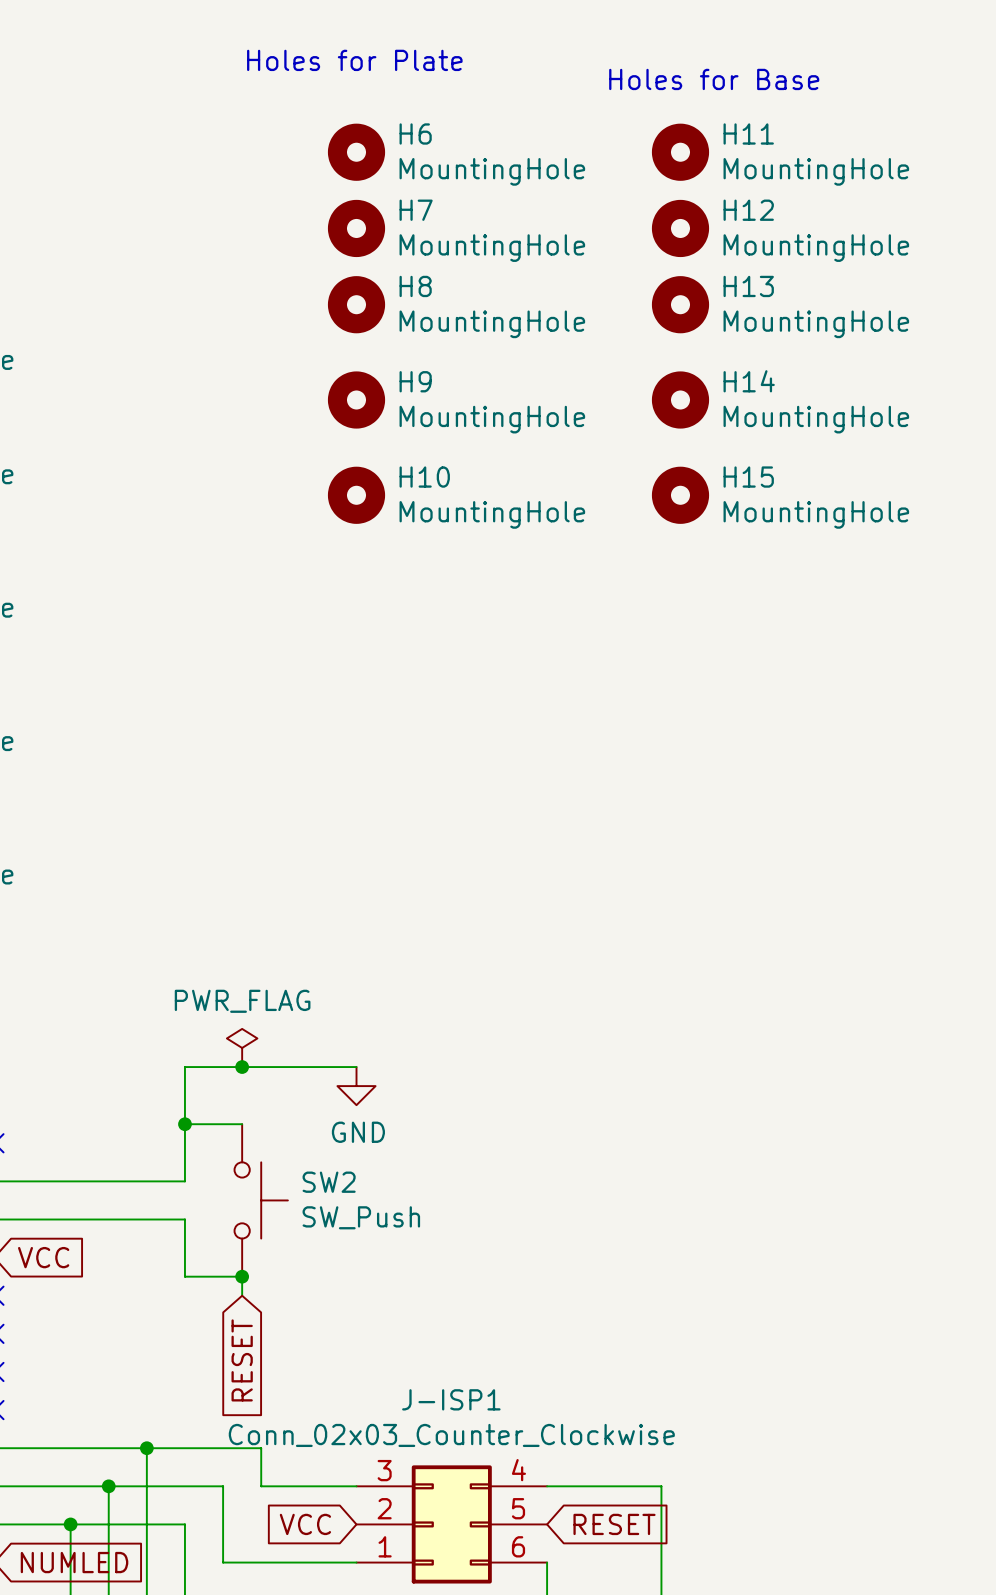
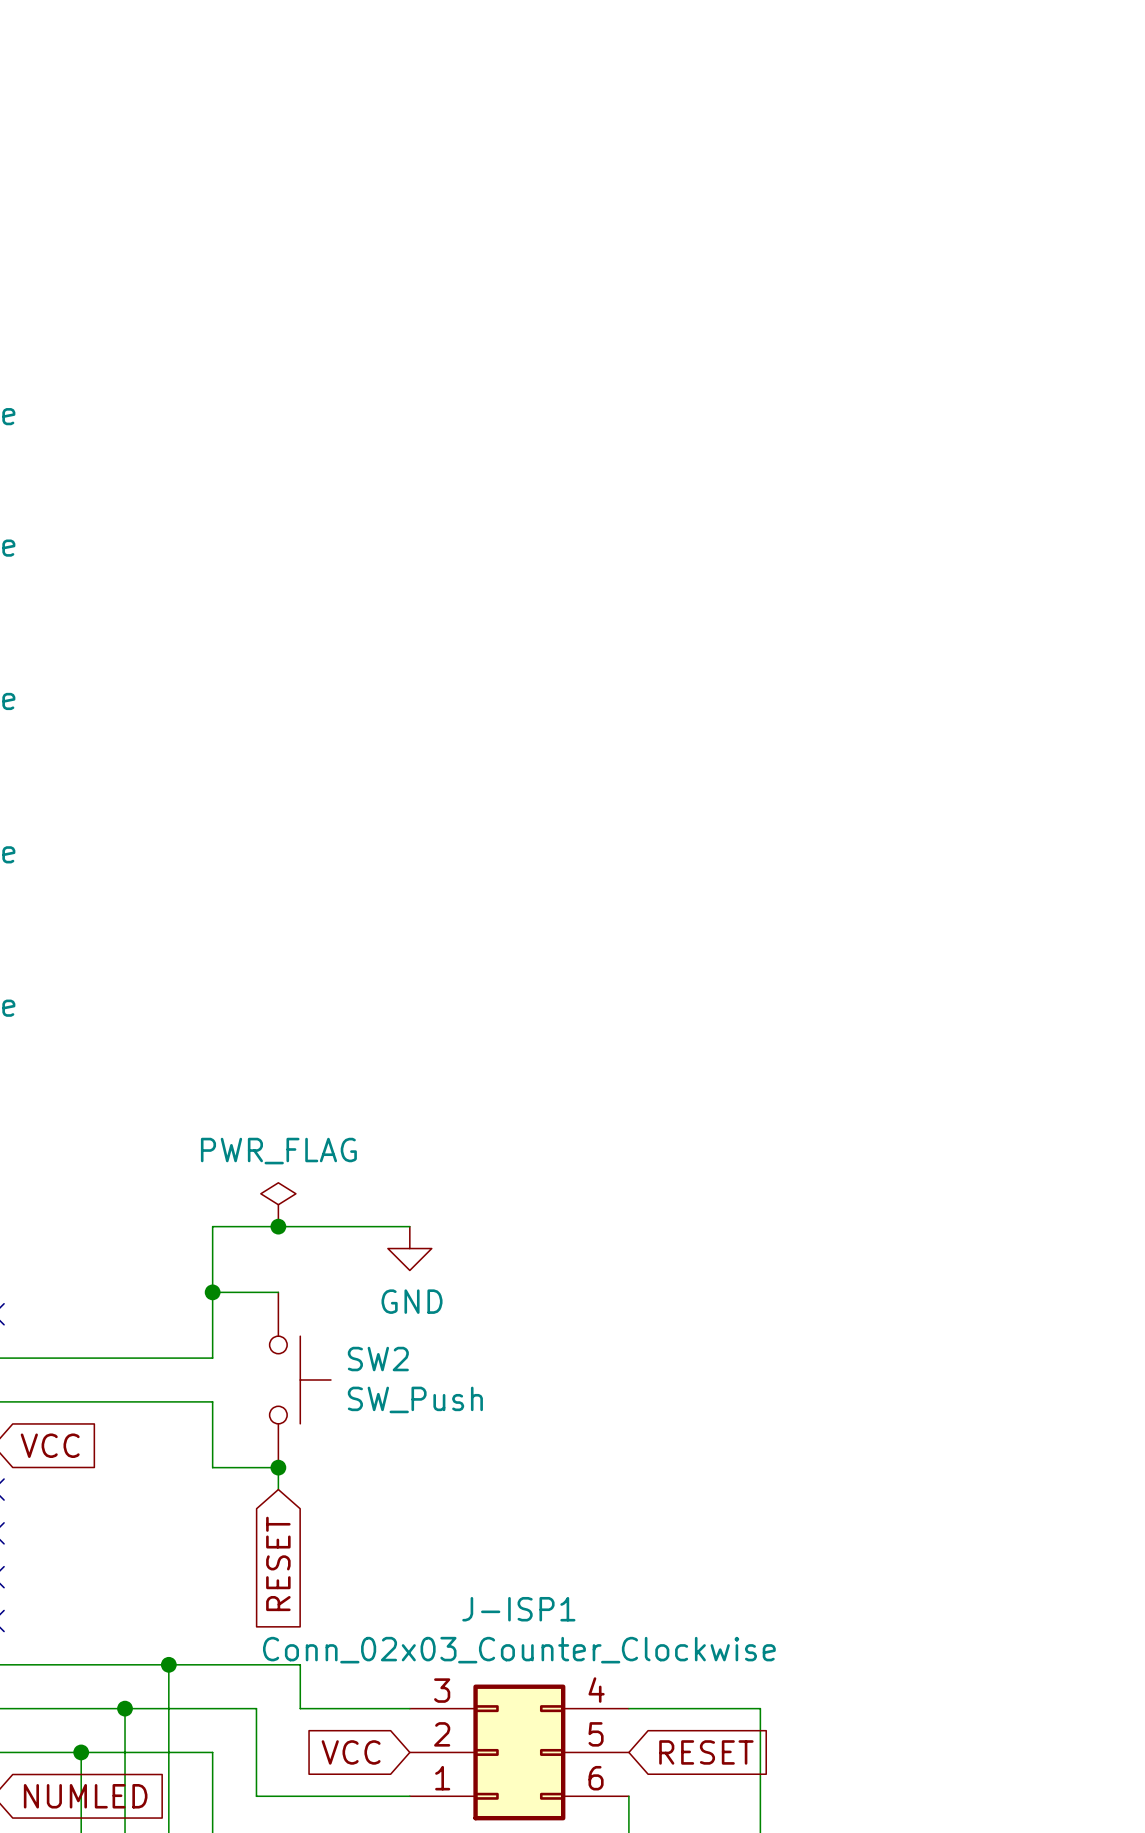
text: Holes for Plate (354, 60) -> none
text: Holes for Base (714, 79) -> none
H6: MountingHole (356, 152) -> none
H11: MountingHole (680, 152) -> none
H7: MountingHole (356, 228) -> none
H12: MountingHole (680, 228) -> none
H8: MountingHole (356, 304) -> none
H13: MountingHole (680, 304) -> none
H9: MountingHole (356, 399) -> none
H14: MountingHole (680, 399) -> none
H10: MountingHole (356, 495) -> none
H15: MountingHole (680, 495) -> none

